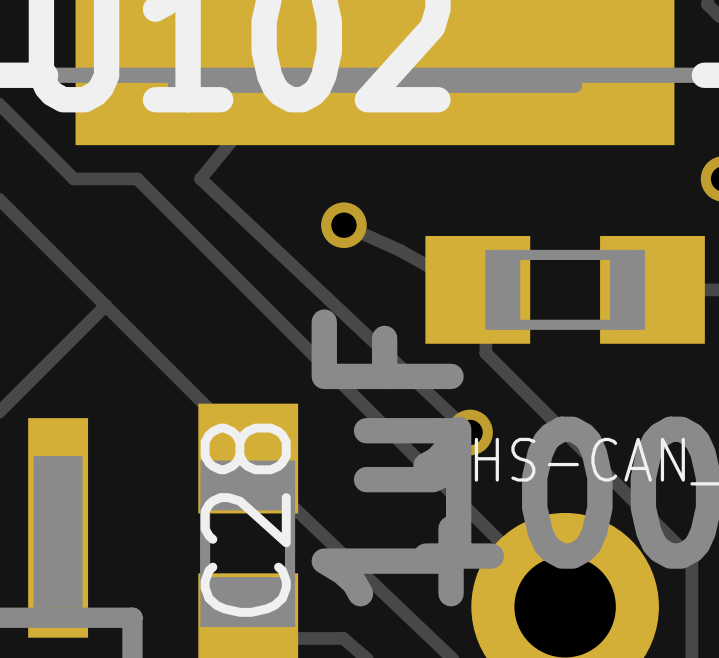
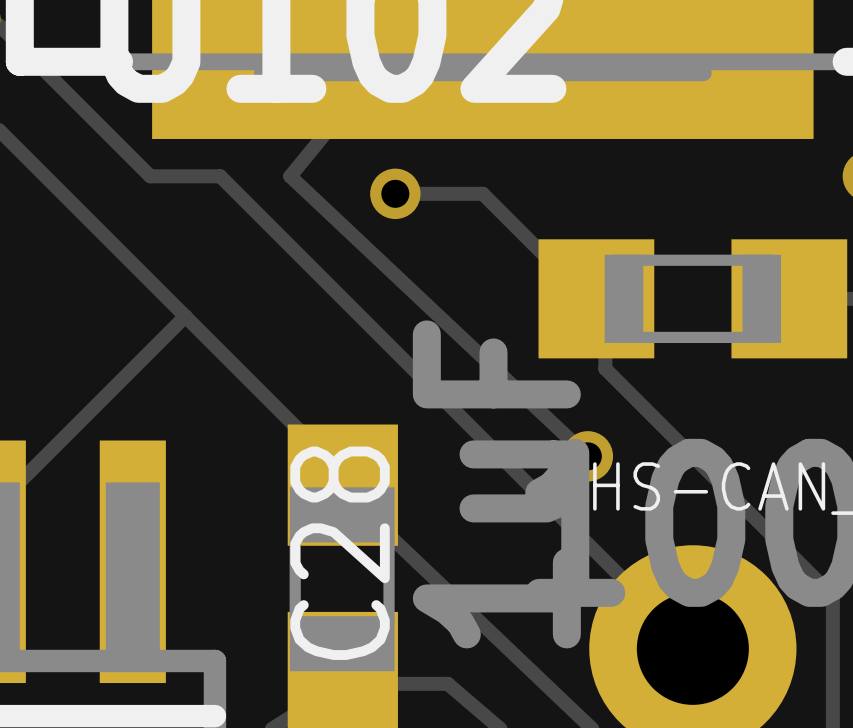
track: (343, 225) (400, 250) (470, 289) -> (395, 193) (482, 193) (587, 298)
via position: (343, 225) -> (395, 193)

